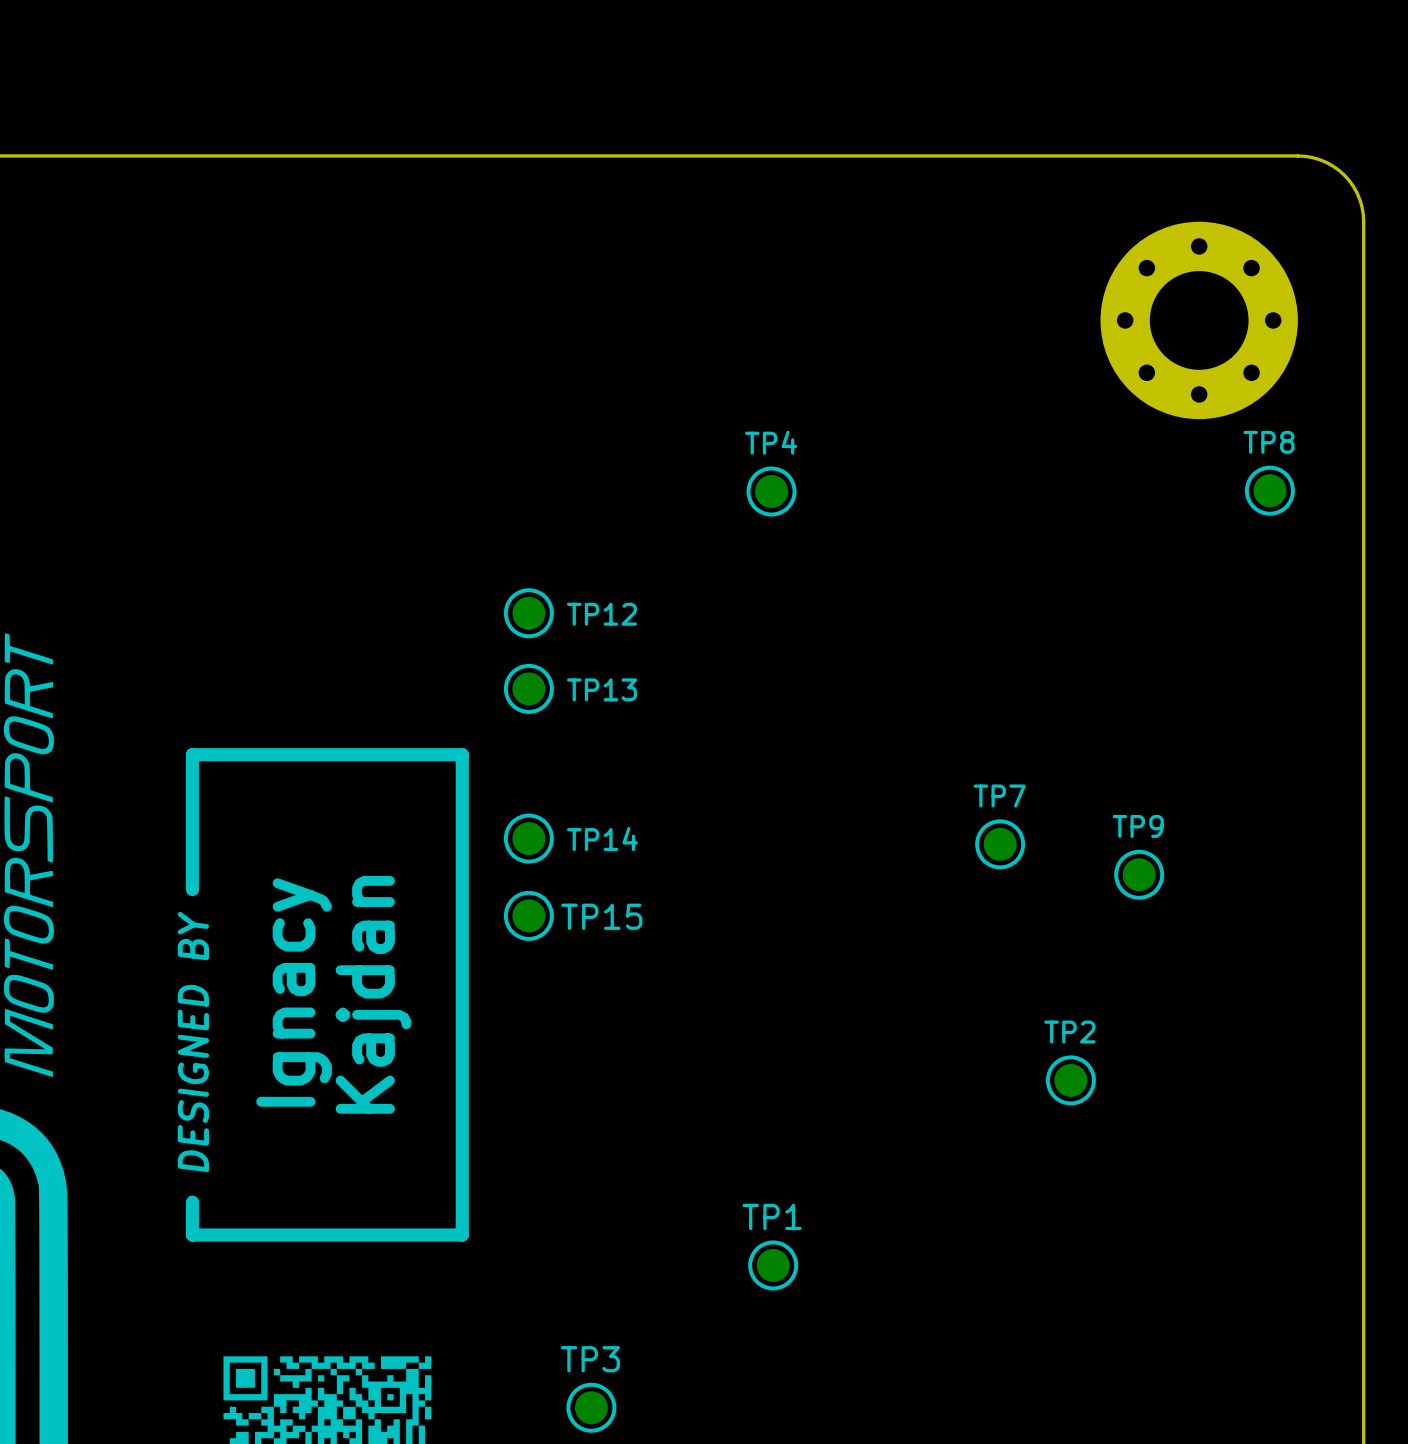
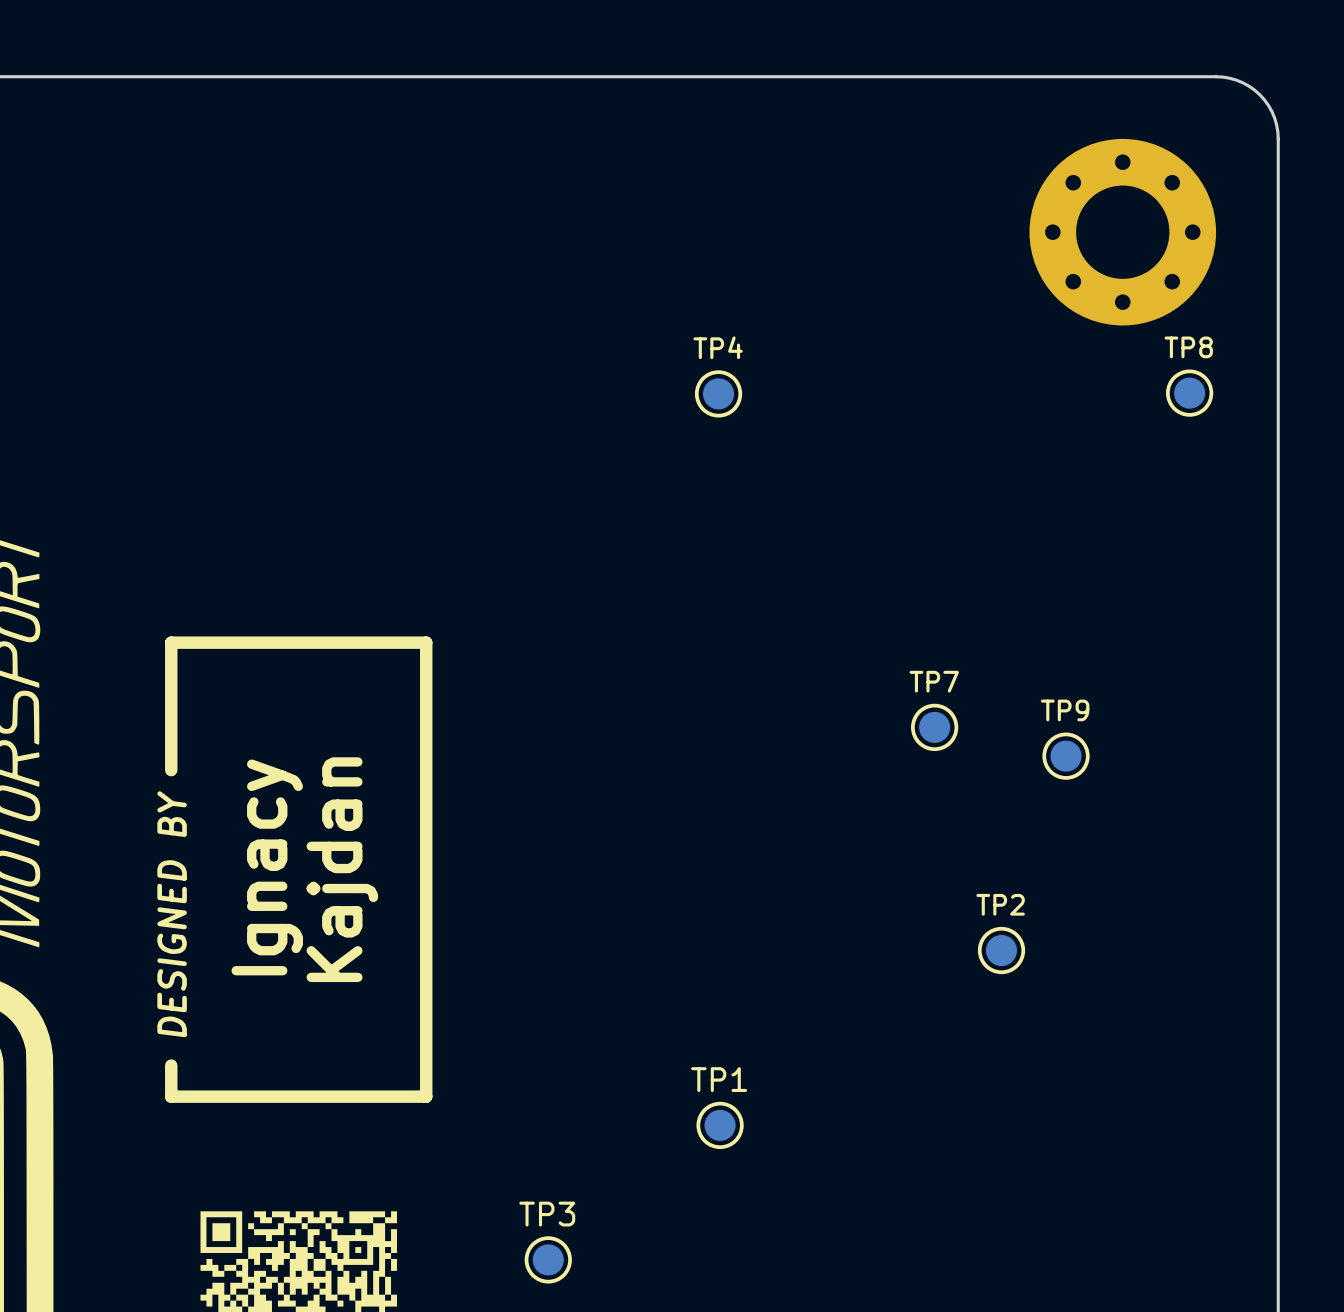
TP12: (528, 613) -> none
TP13: (528, 688) -> none
TP14: (528, 838) -> none
TP15: (528, 915) -> none

